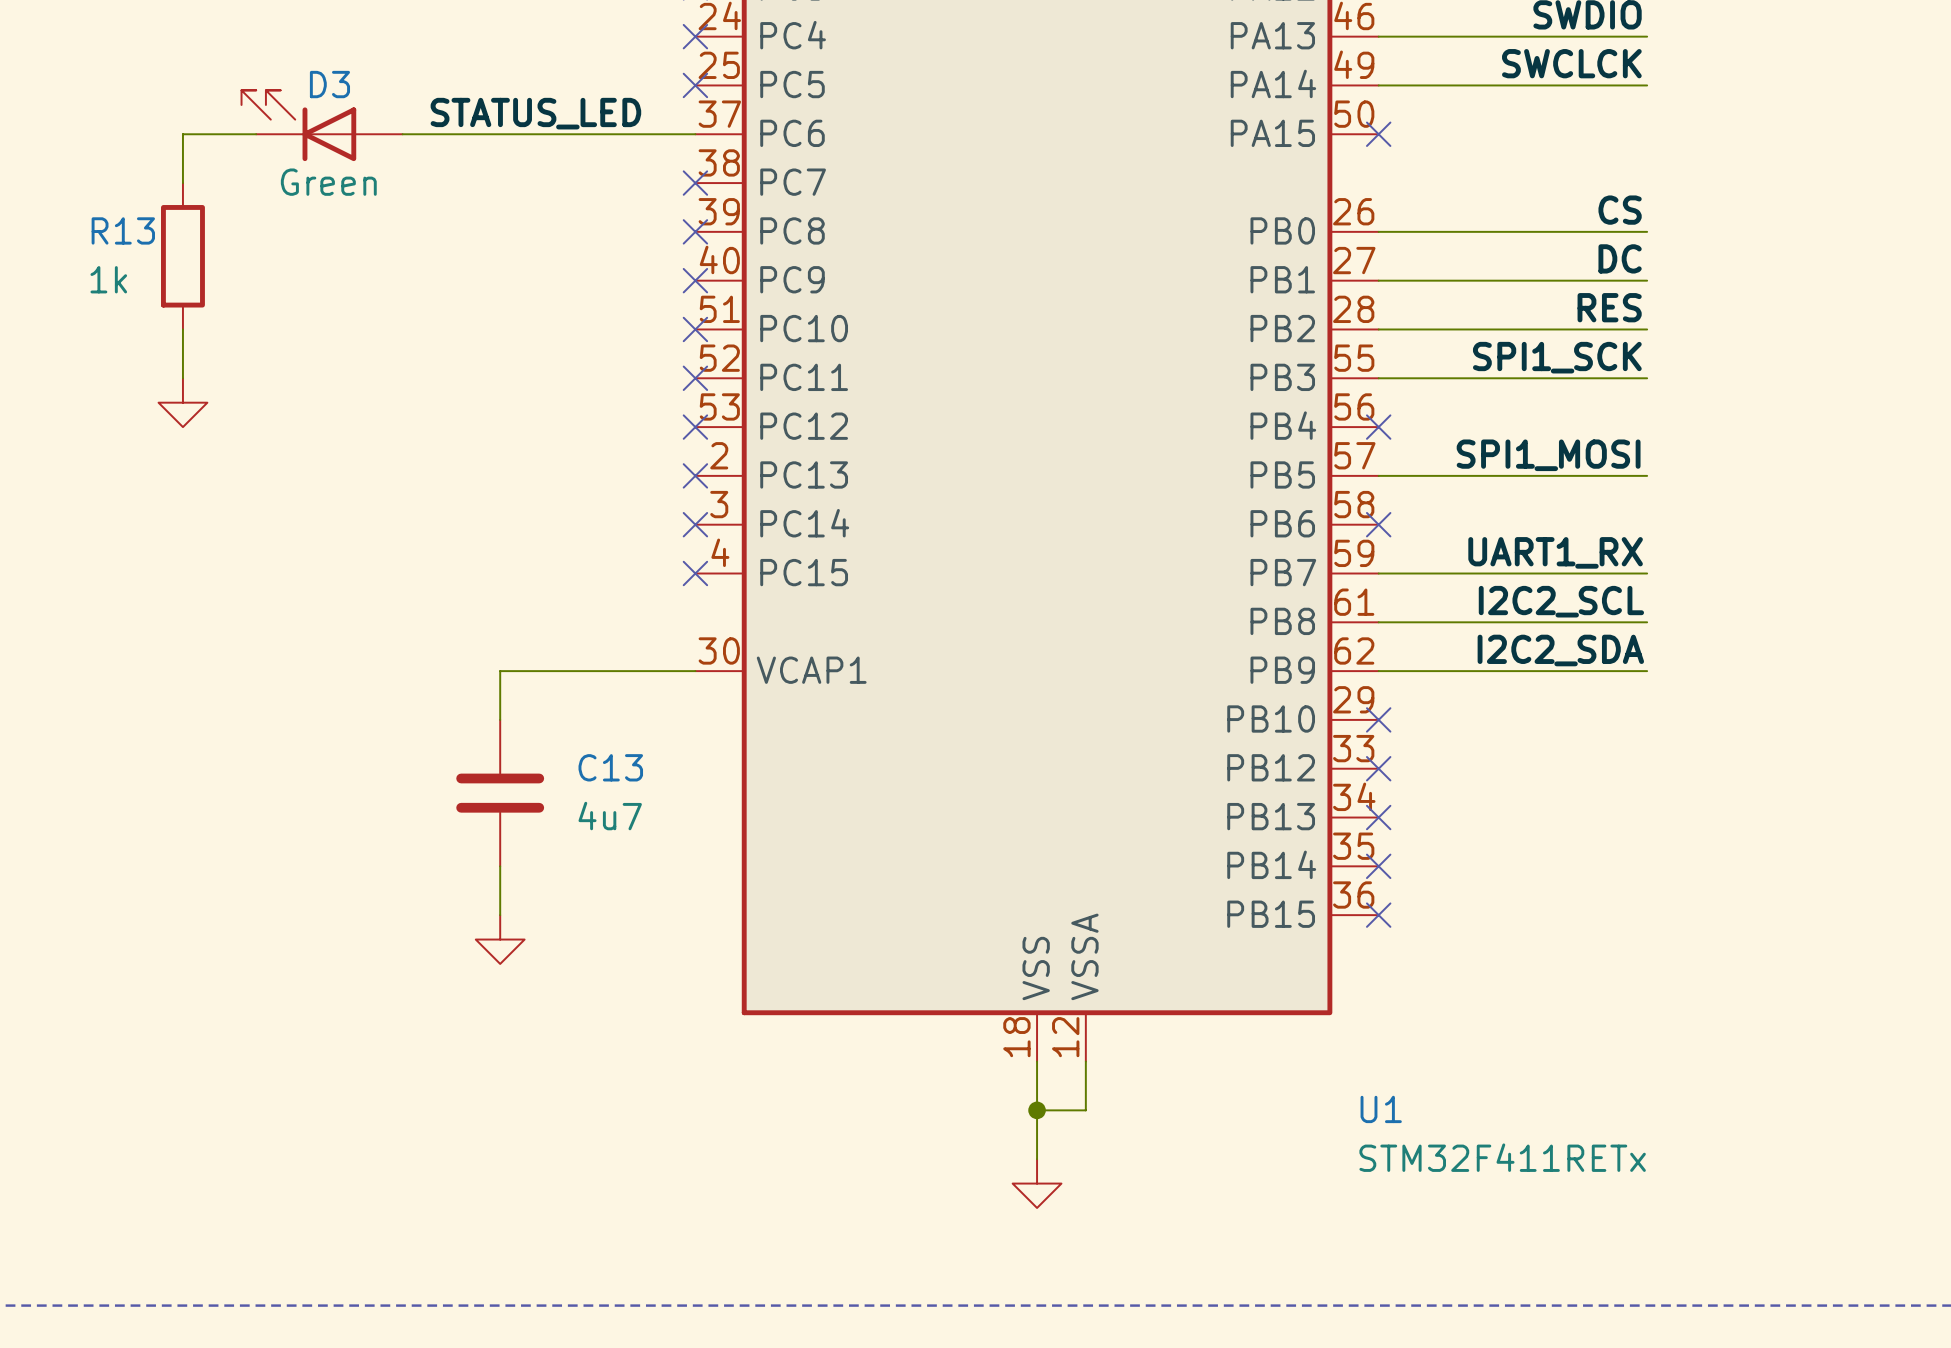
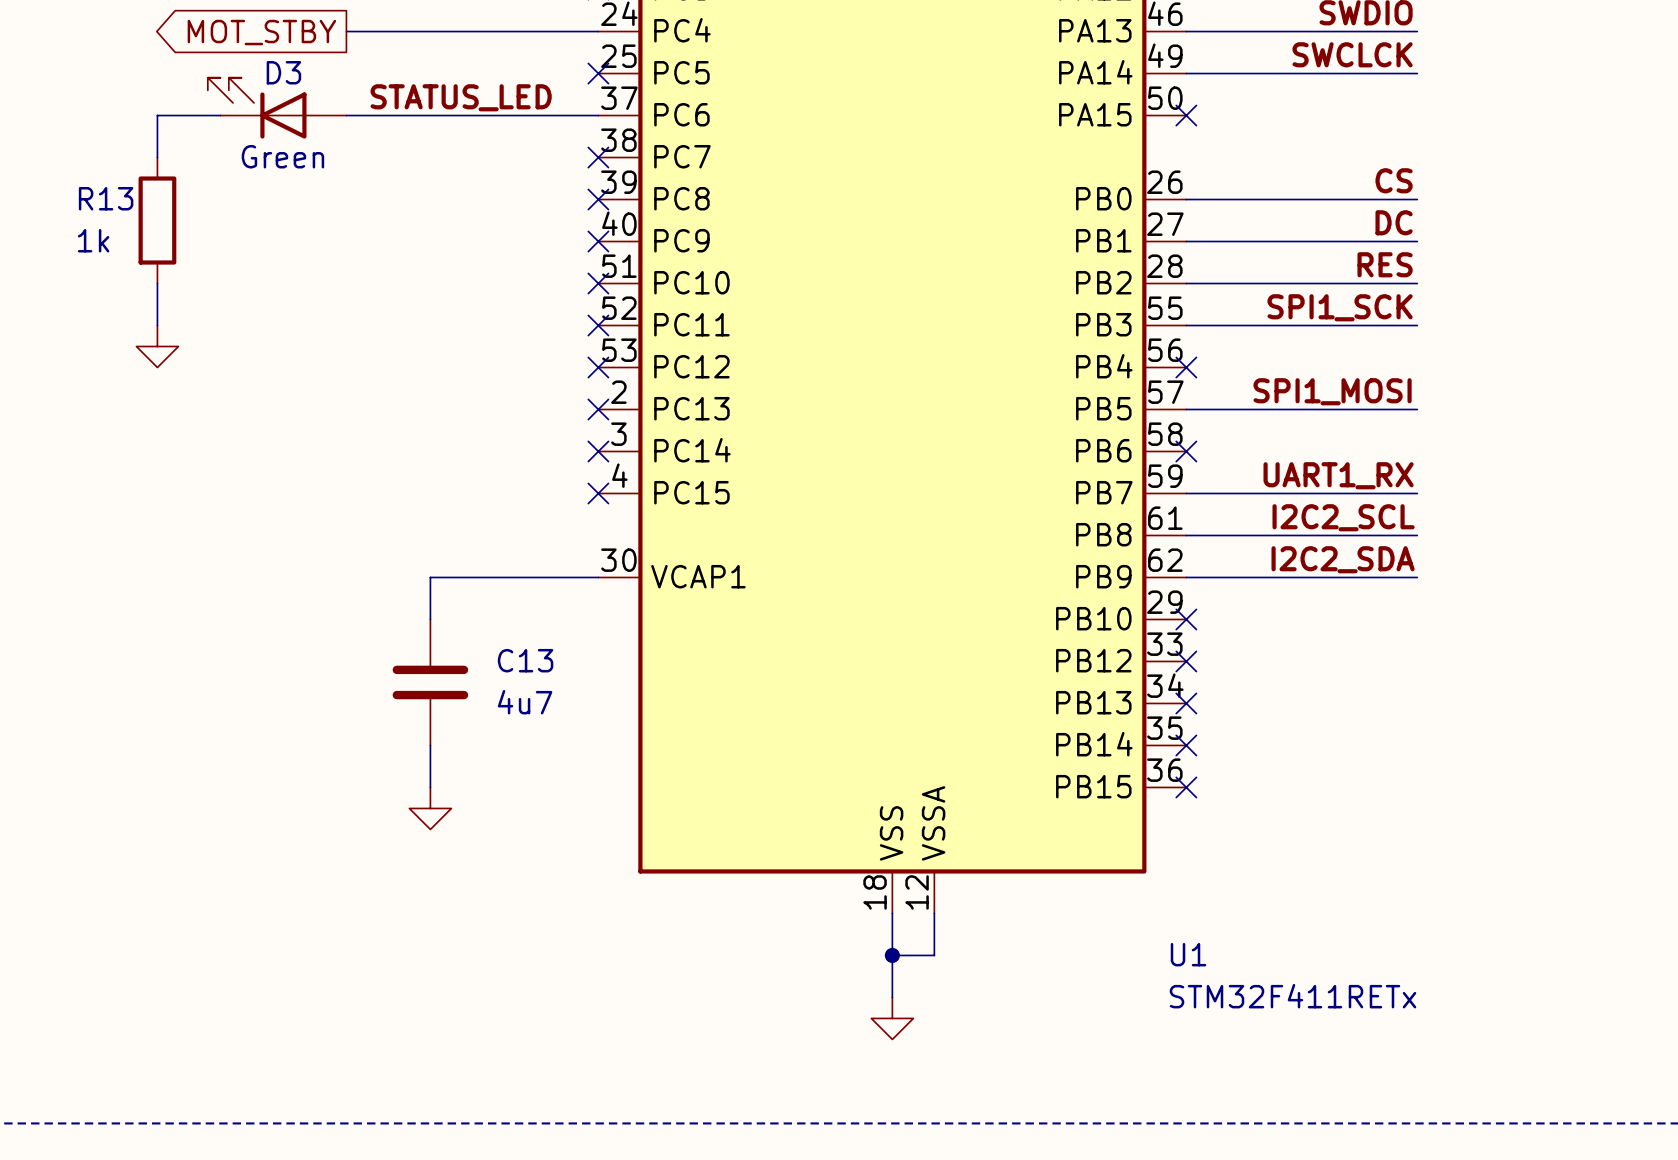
wire: none -> (346, 31) (598, 31)
no-connect mark: (695, 36) -> none
global label: none -> MOT_STBY (261, 32)

